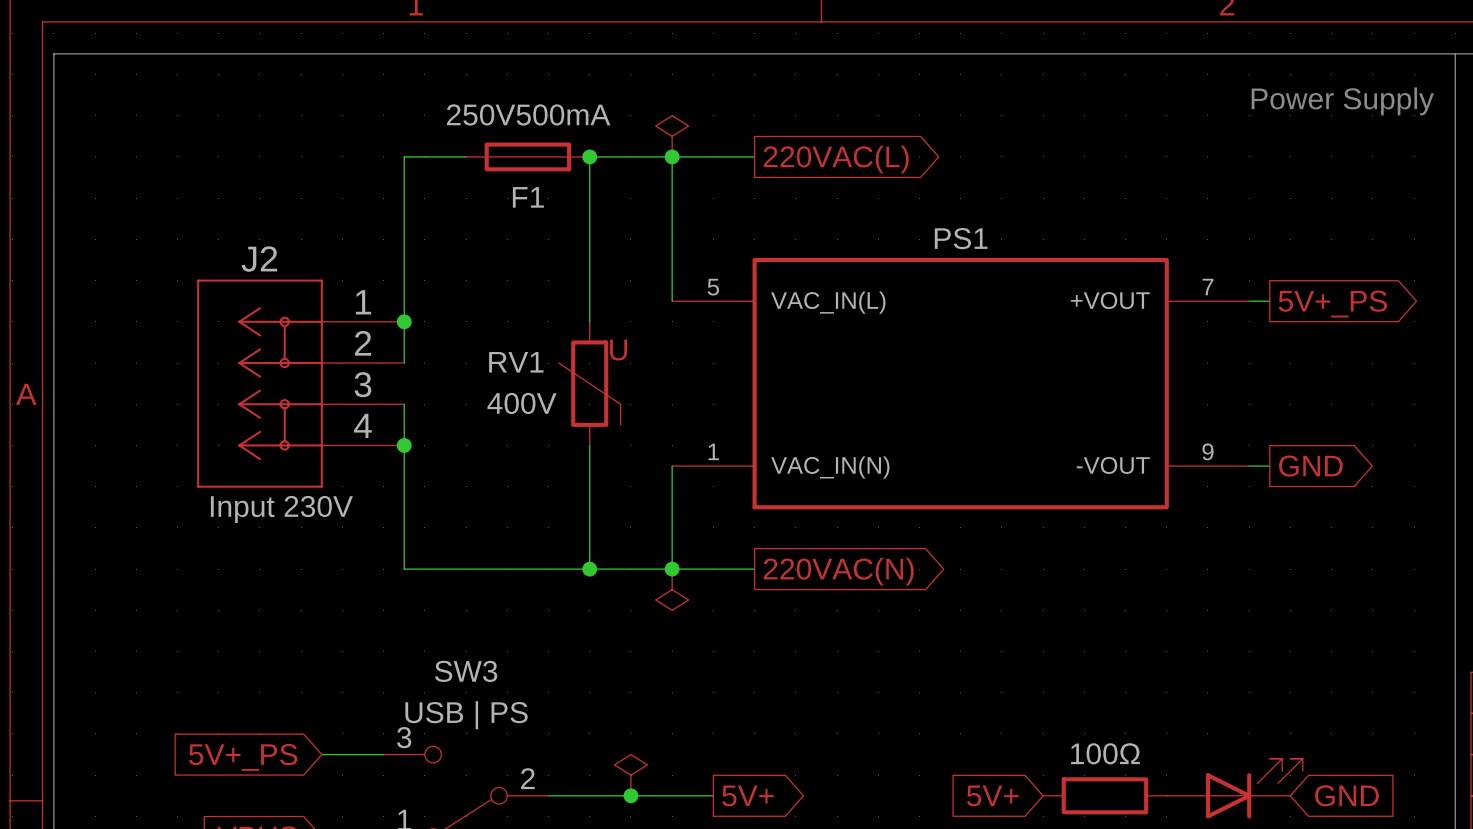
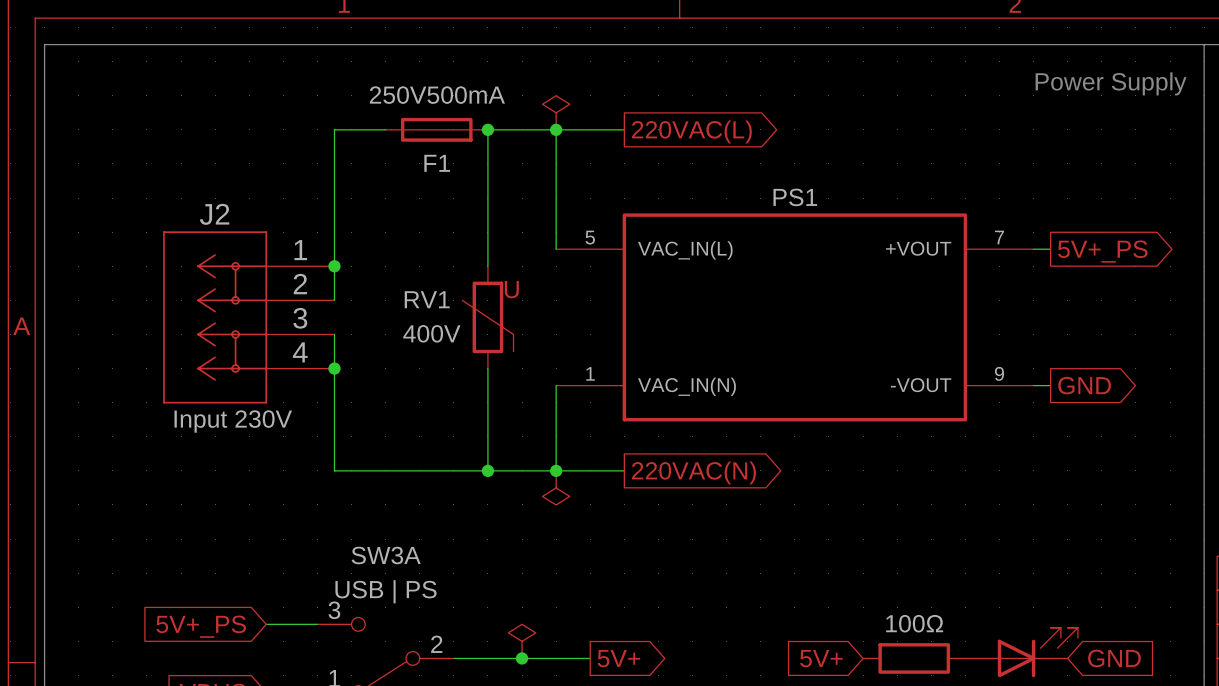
SW3 name: SW3 (466, 671) -> SW3A (386, 555)

